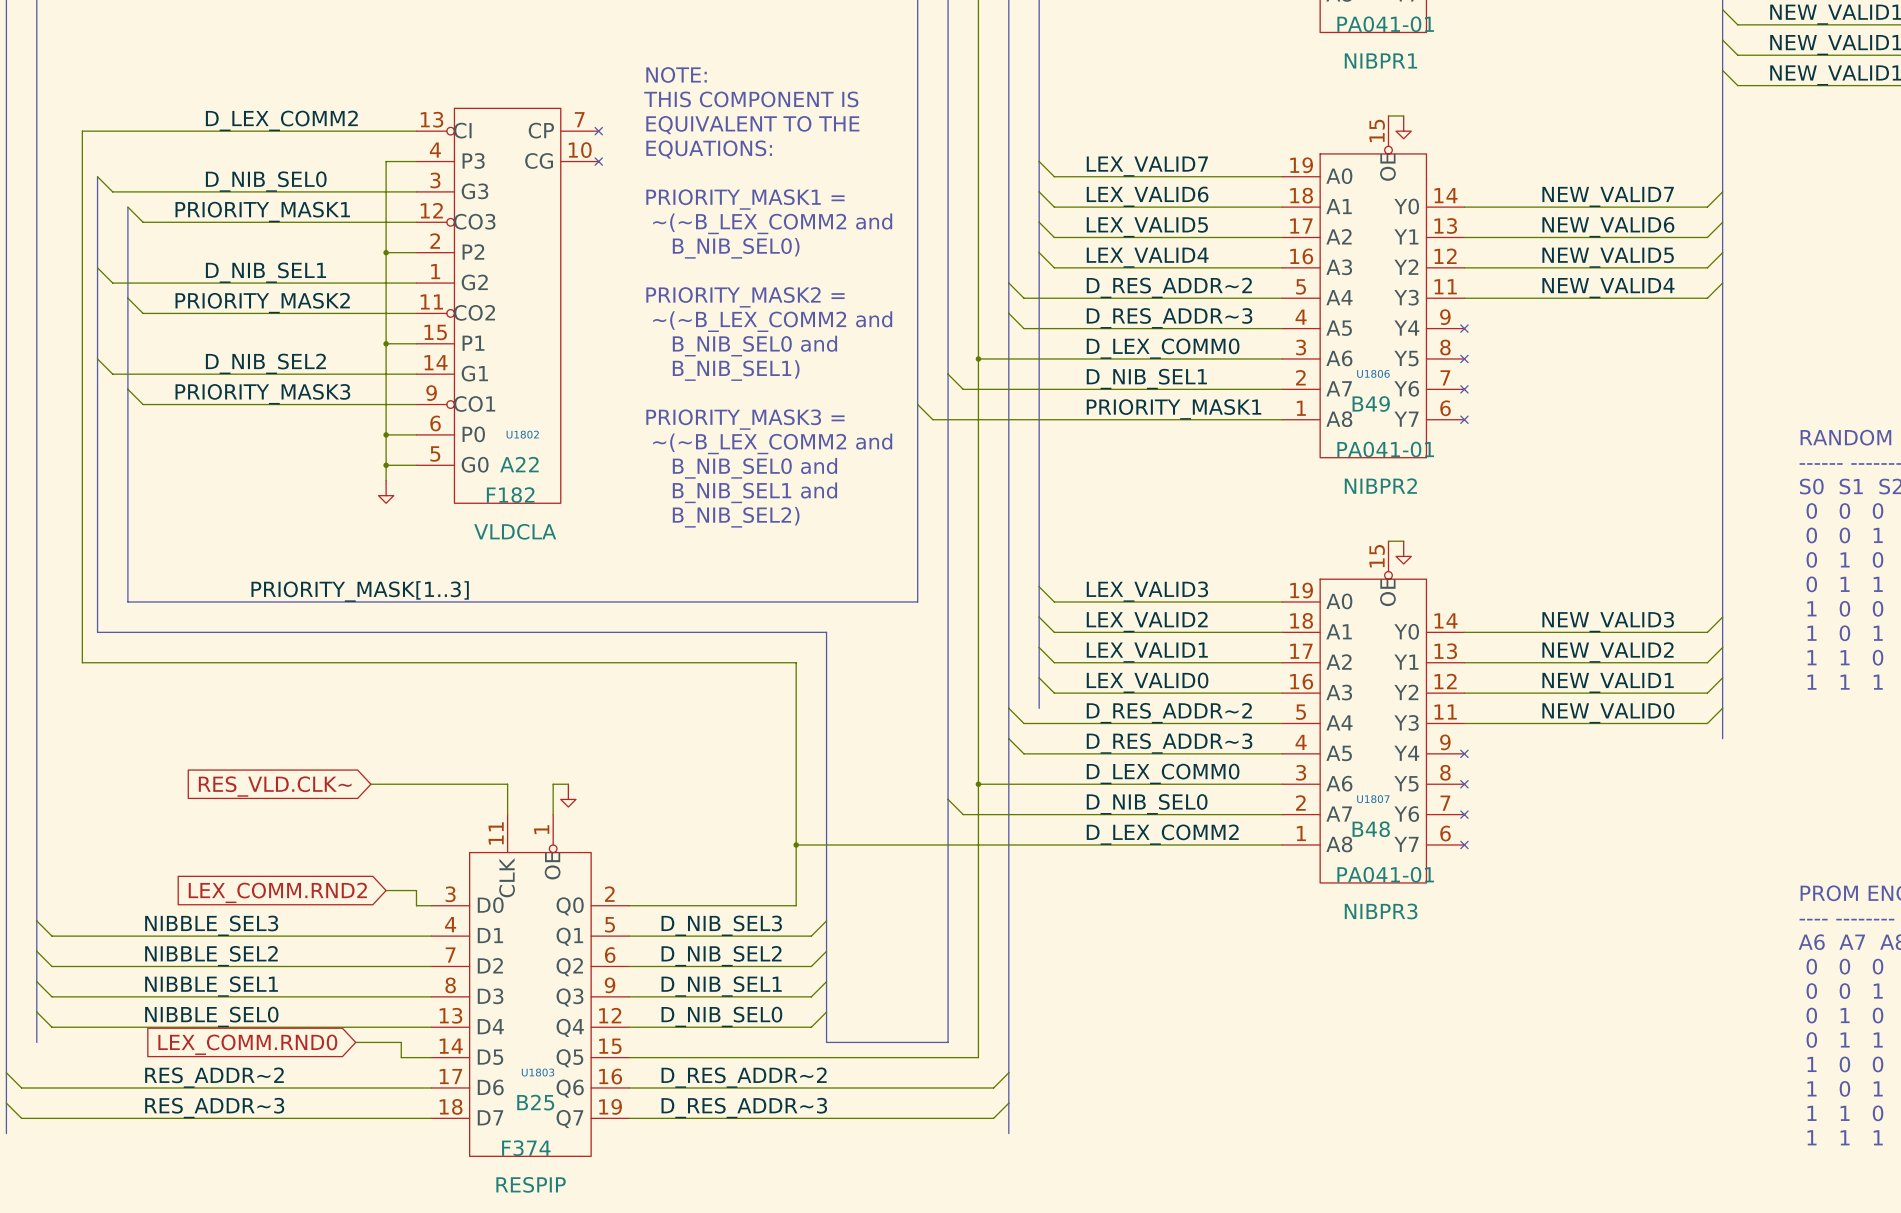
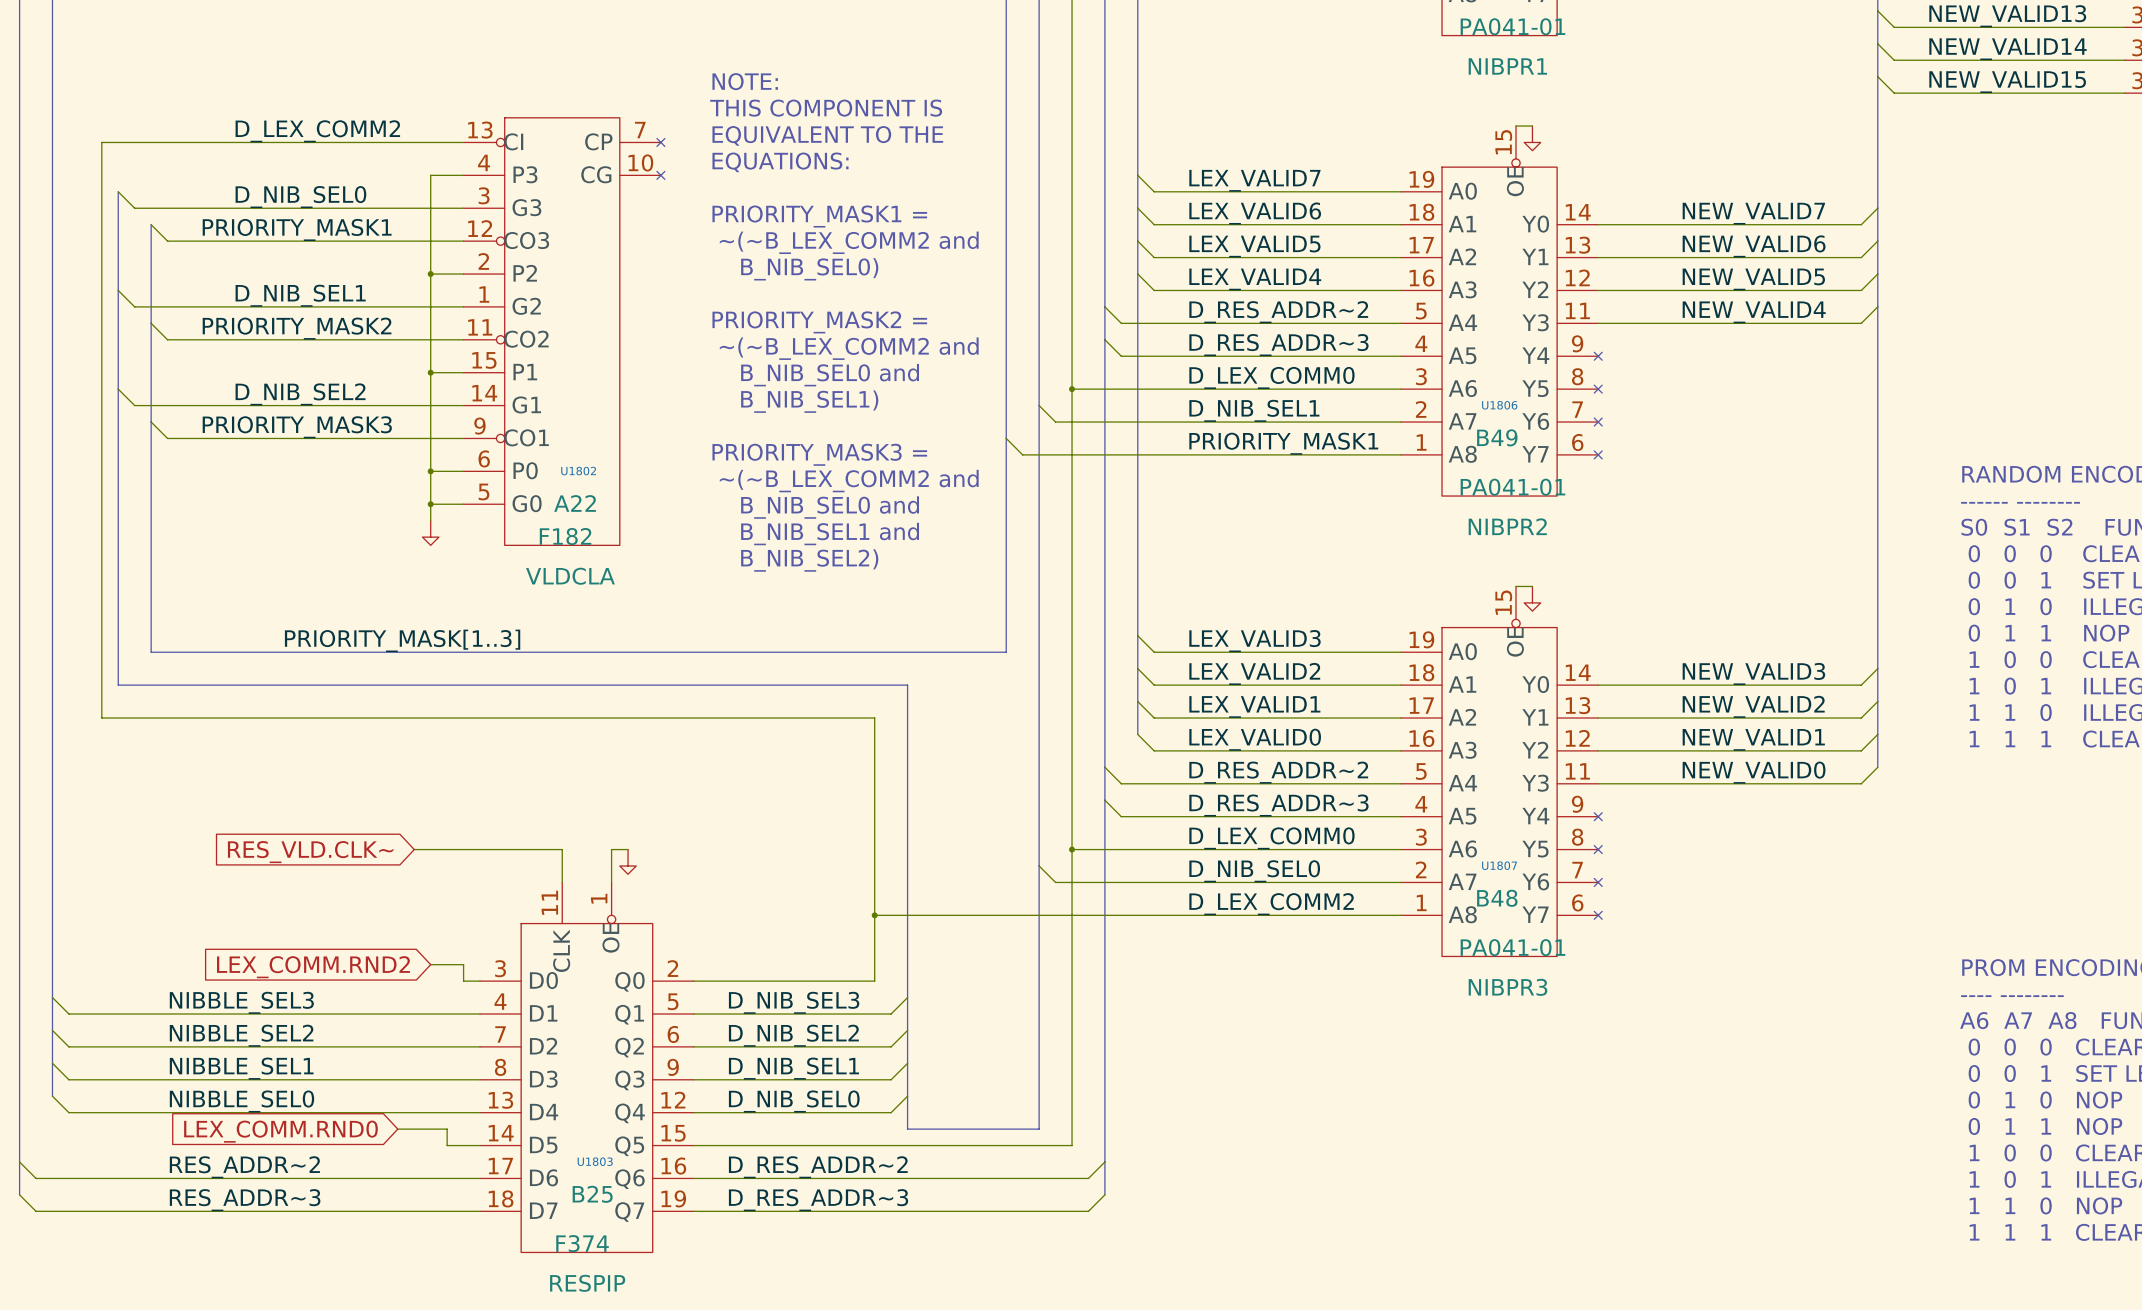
bus: (1039, 677) (1039, 708) -> none
bus: (1722, 708) (1722, 738) -> none
bus: (36, 1012) (36, 1042) -> none
bus: (6, 1103) (6, 1133) -> none
bus: (1008, 1103) (1008, 1133) -> none

